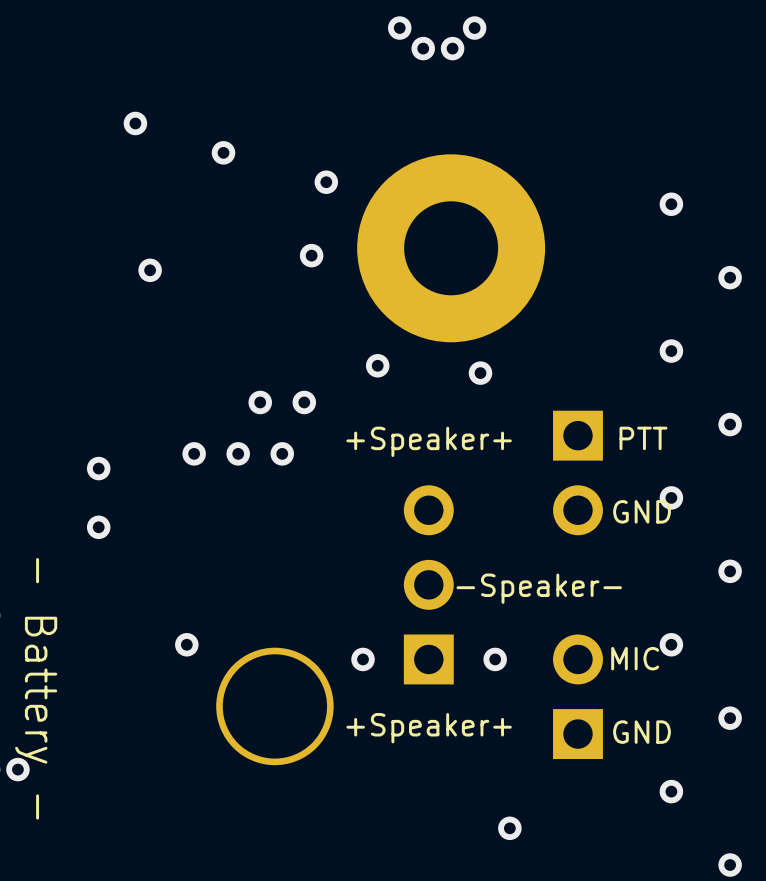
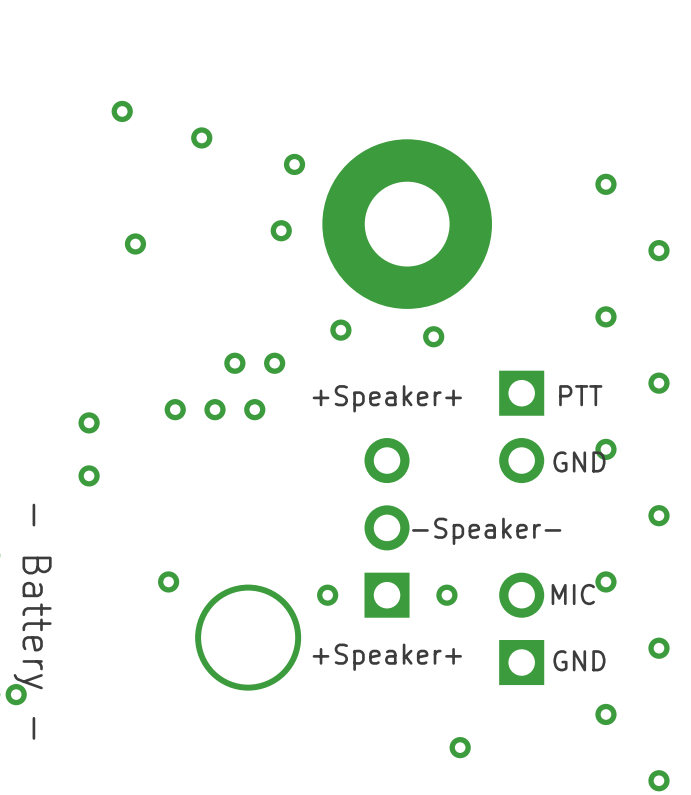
via: (399, 28) -> none
via: (474, 28) -> none
via: (423, 48) -> none
via: (452, 48) -> none

